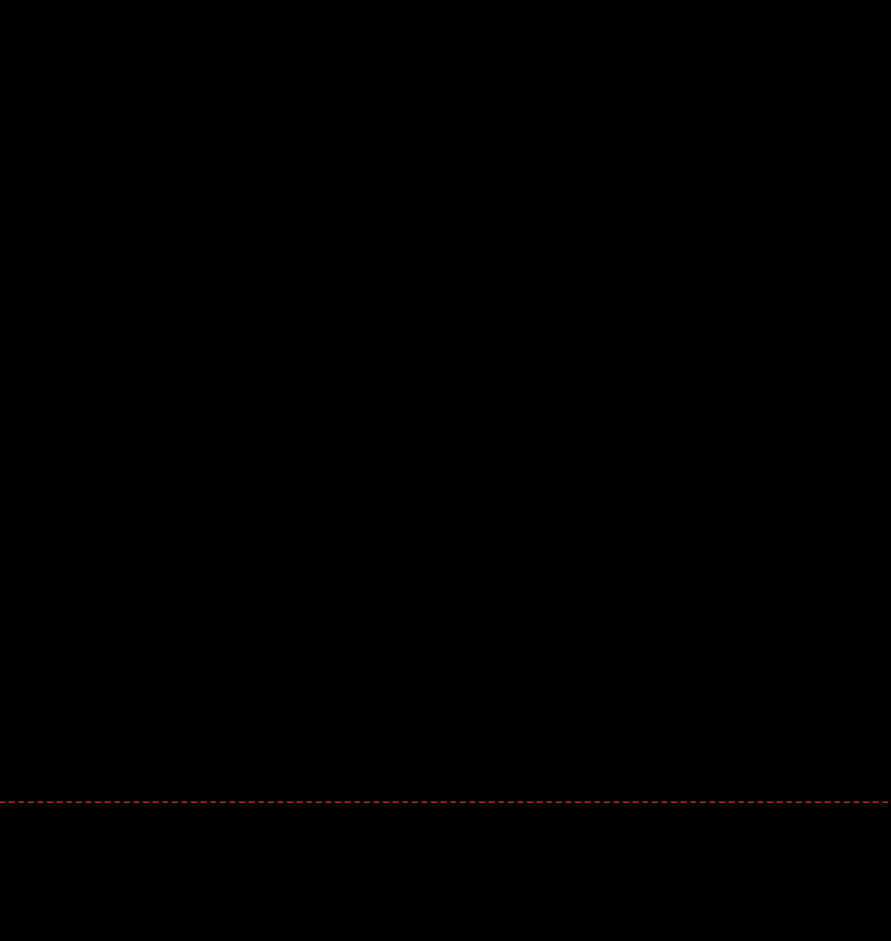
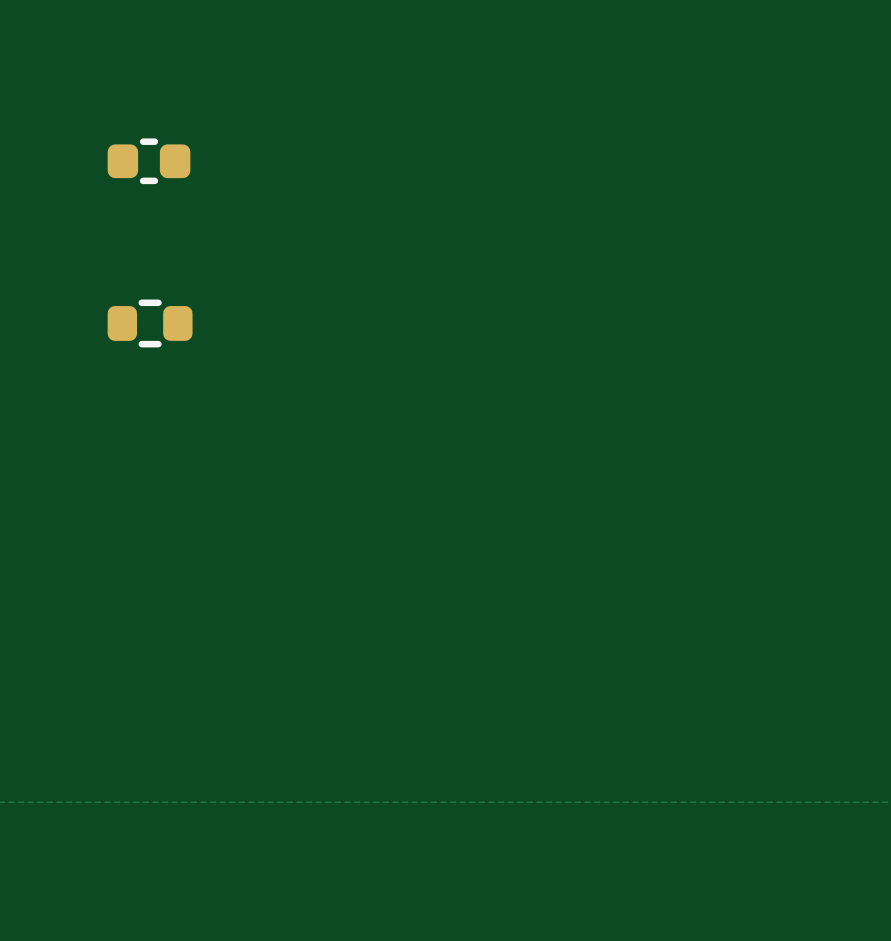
part: none -> (149, 161)
part: none -> (150, 323)

